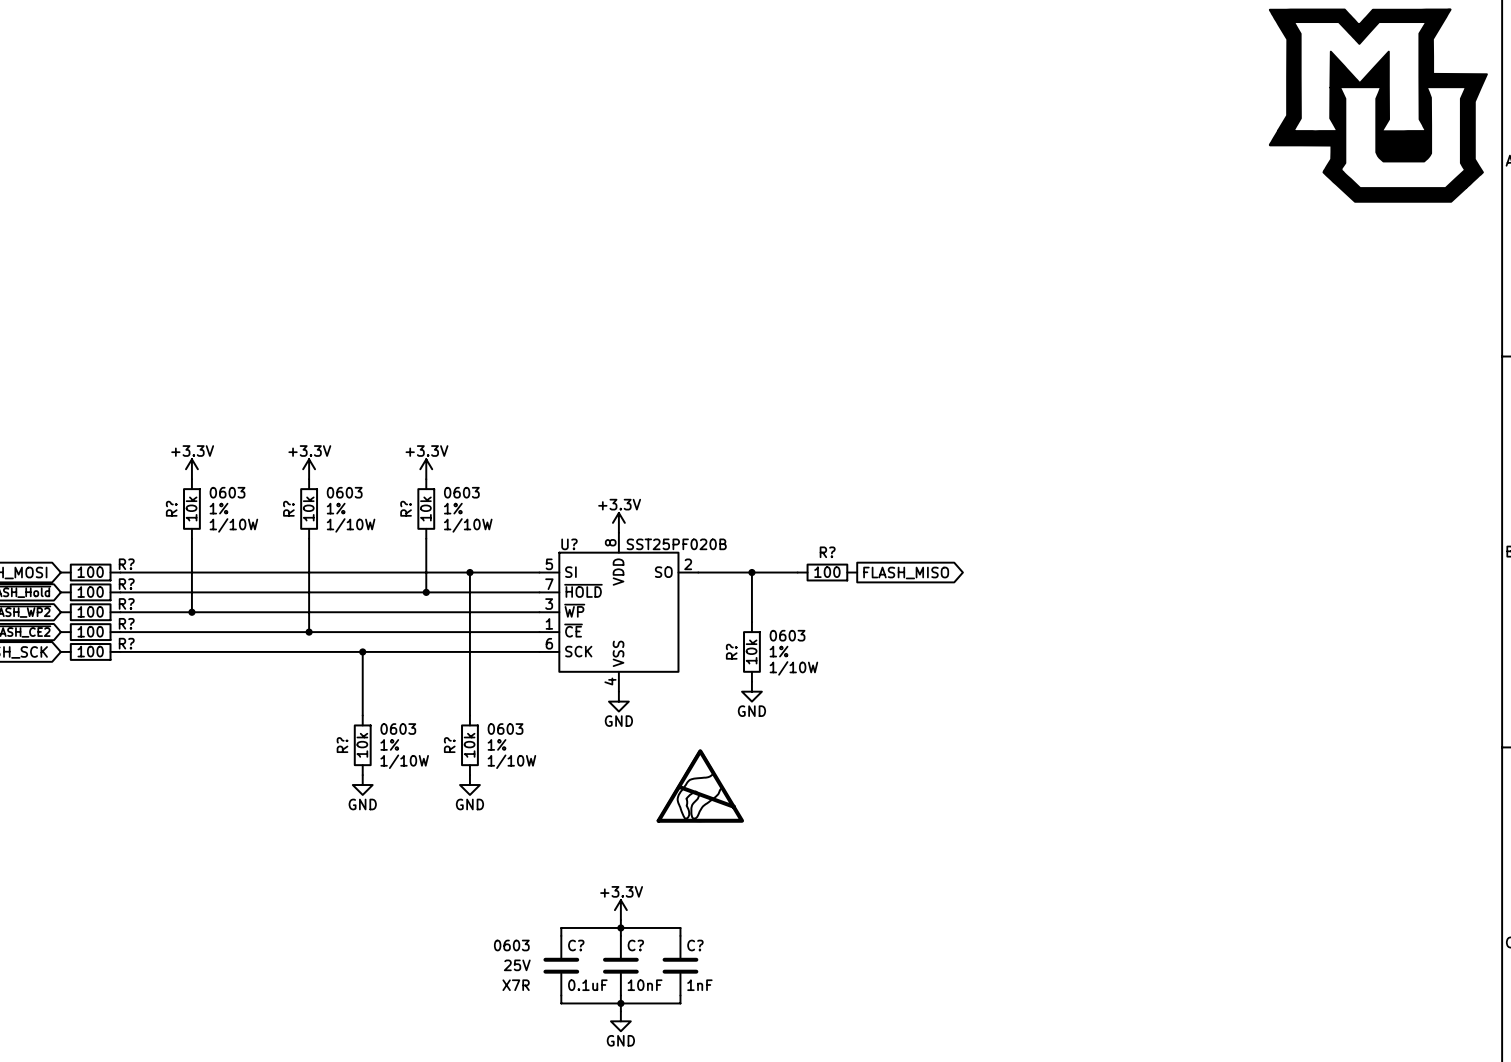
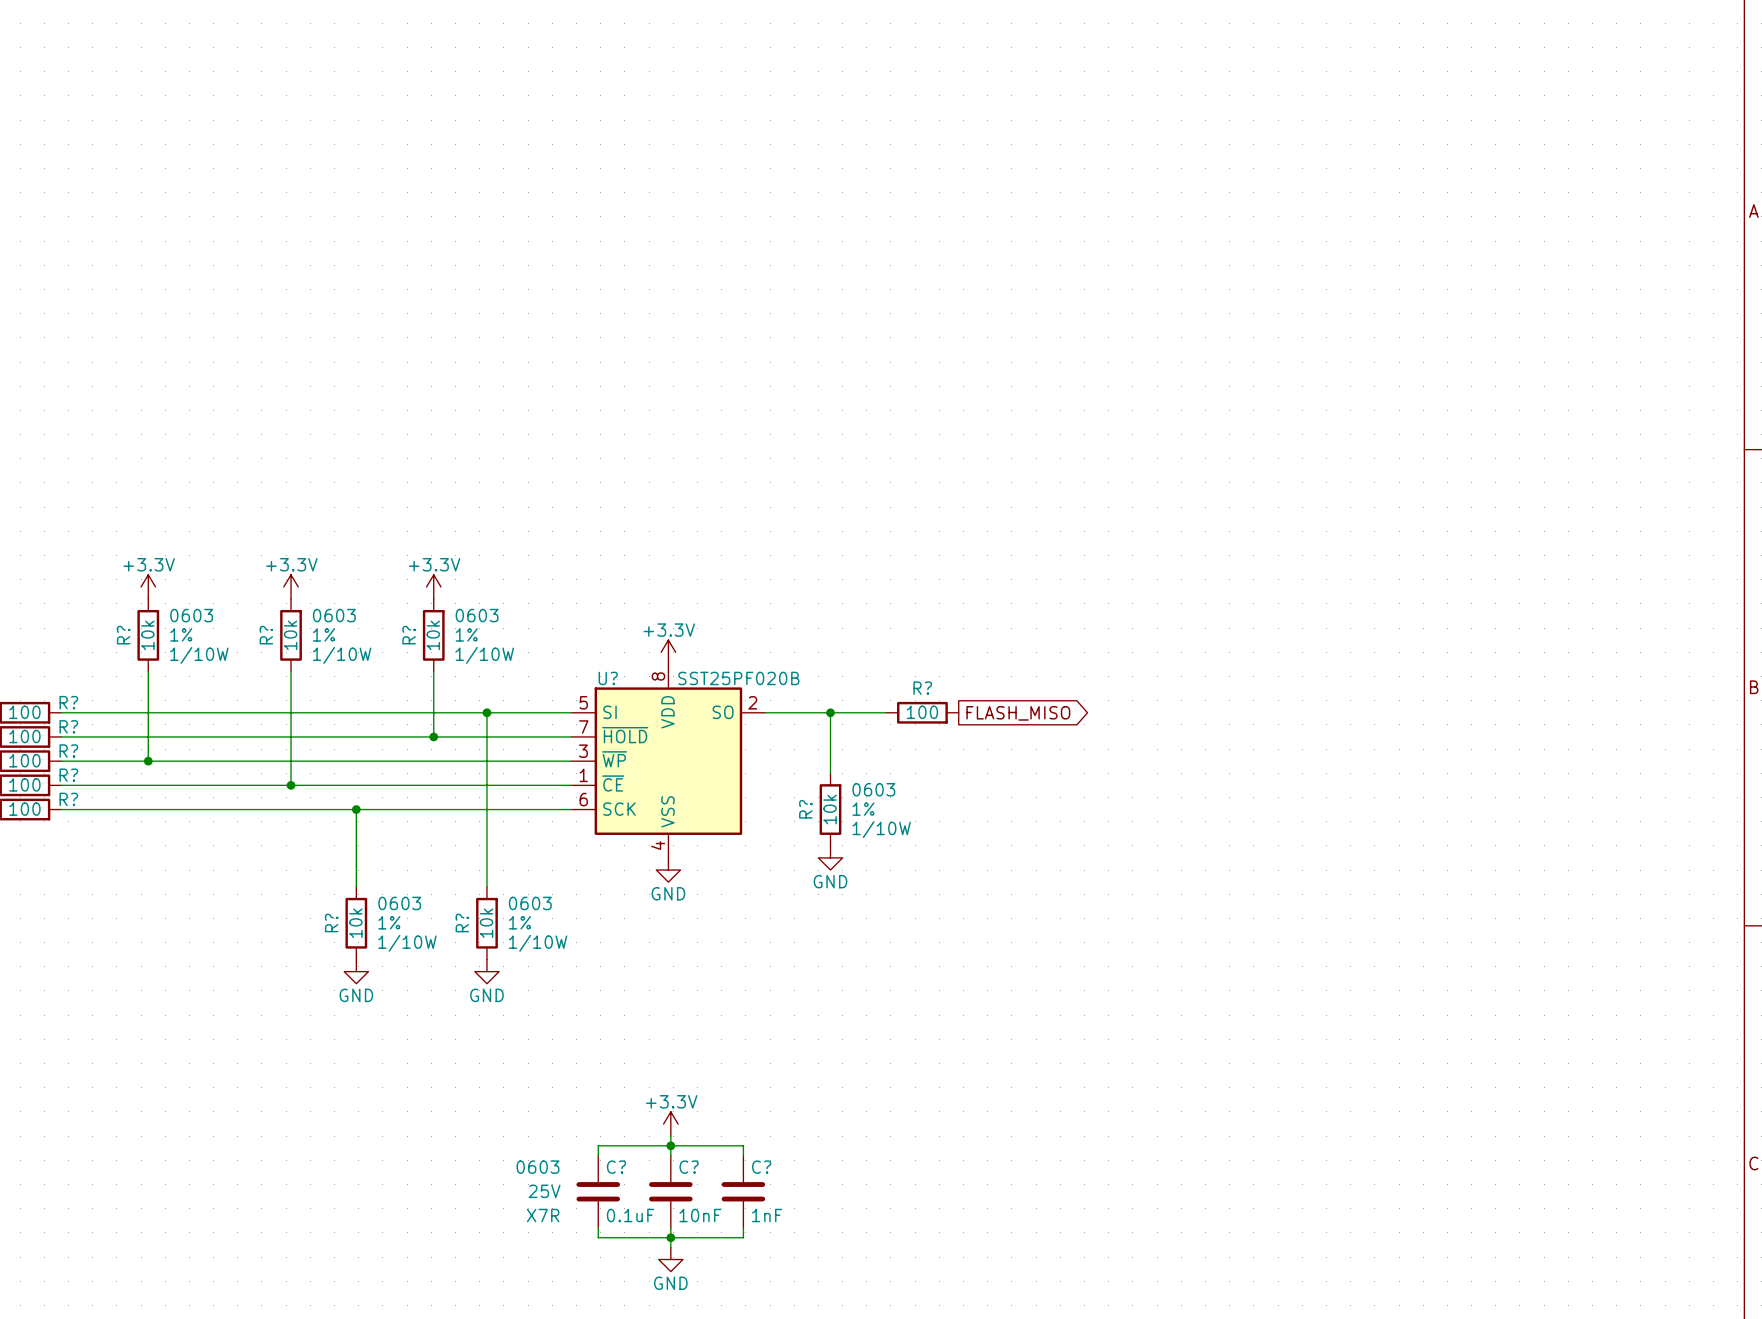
power symbol: (1378, 105) -> none
power symbol: (700, 786) -> none

